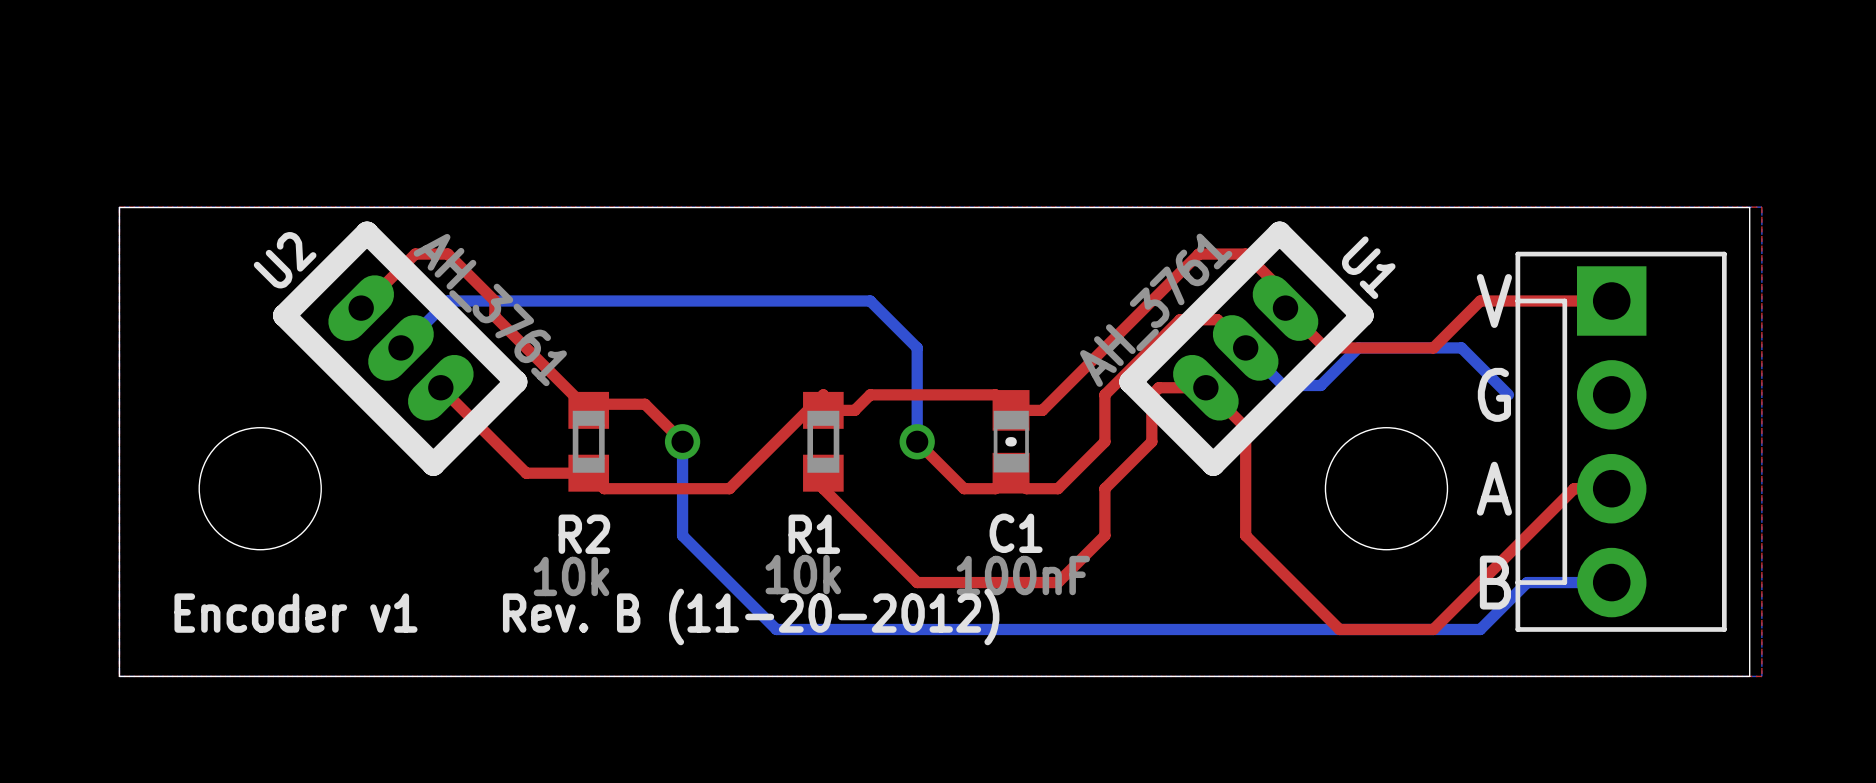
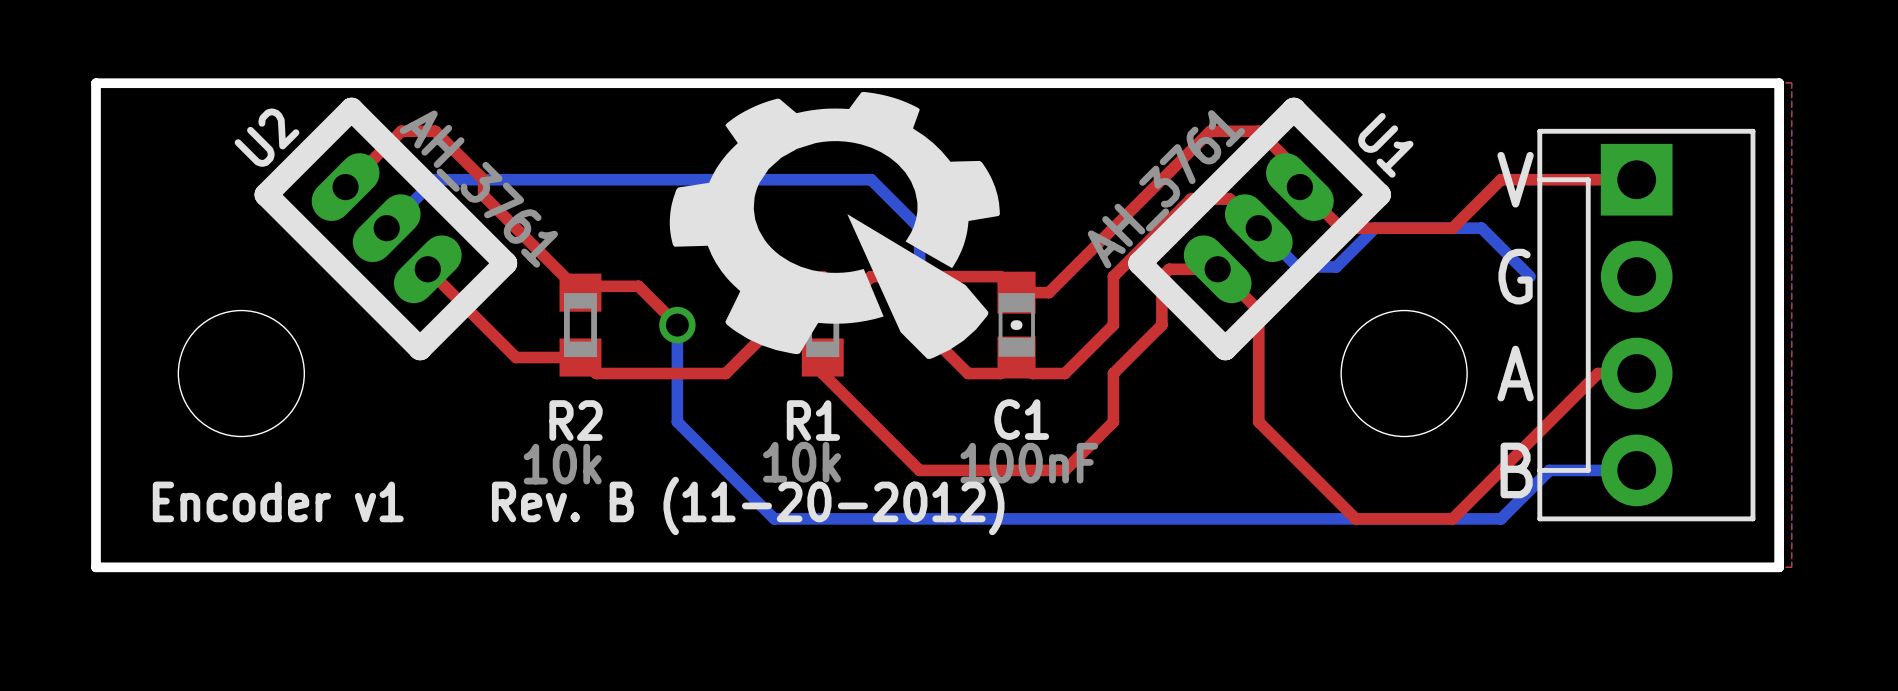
board edge width: thin (119, 207) (1749, 207) (1749, 676) (119, 676) (119, 207) -> thick (95, 83) (1779, 83) (1779, 567) (95, 567) (95, 83)
drawing: none -> [669, 91, 1000, 359]

